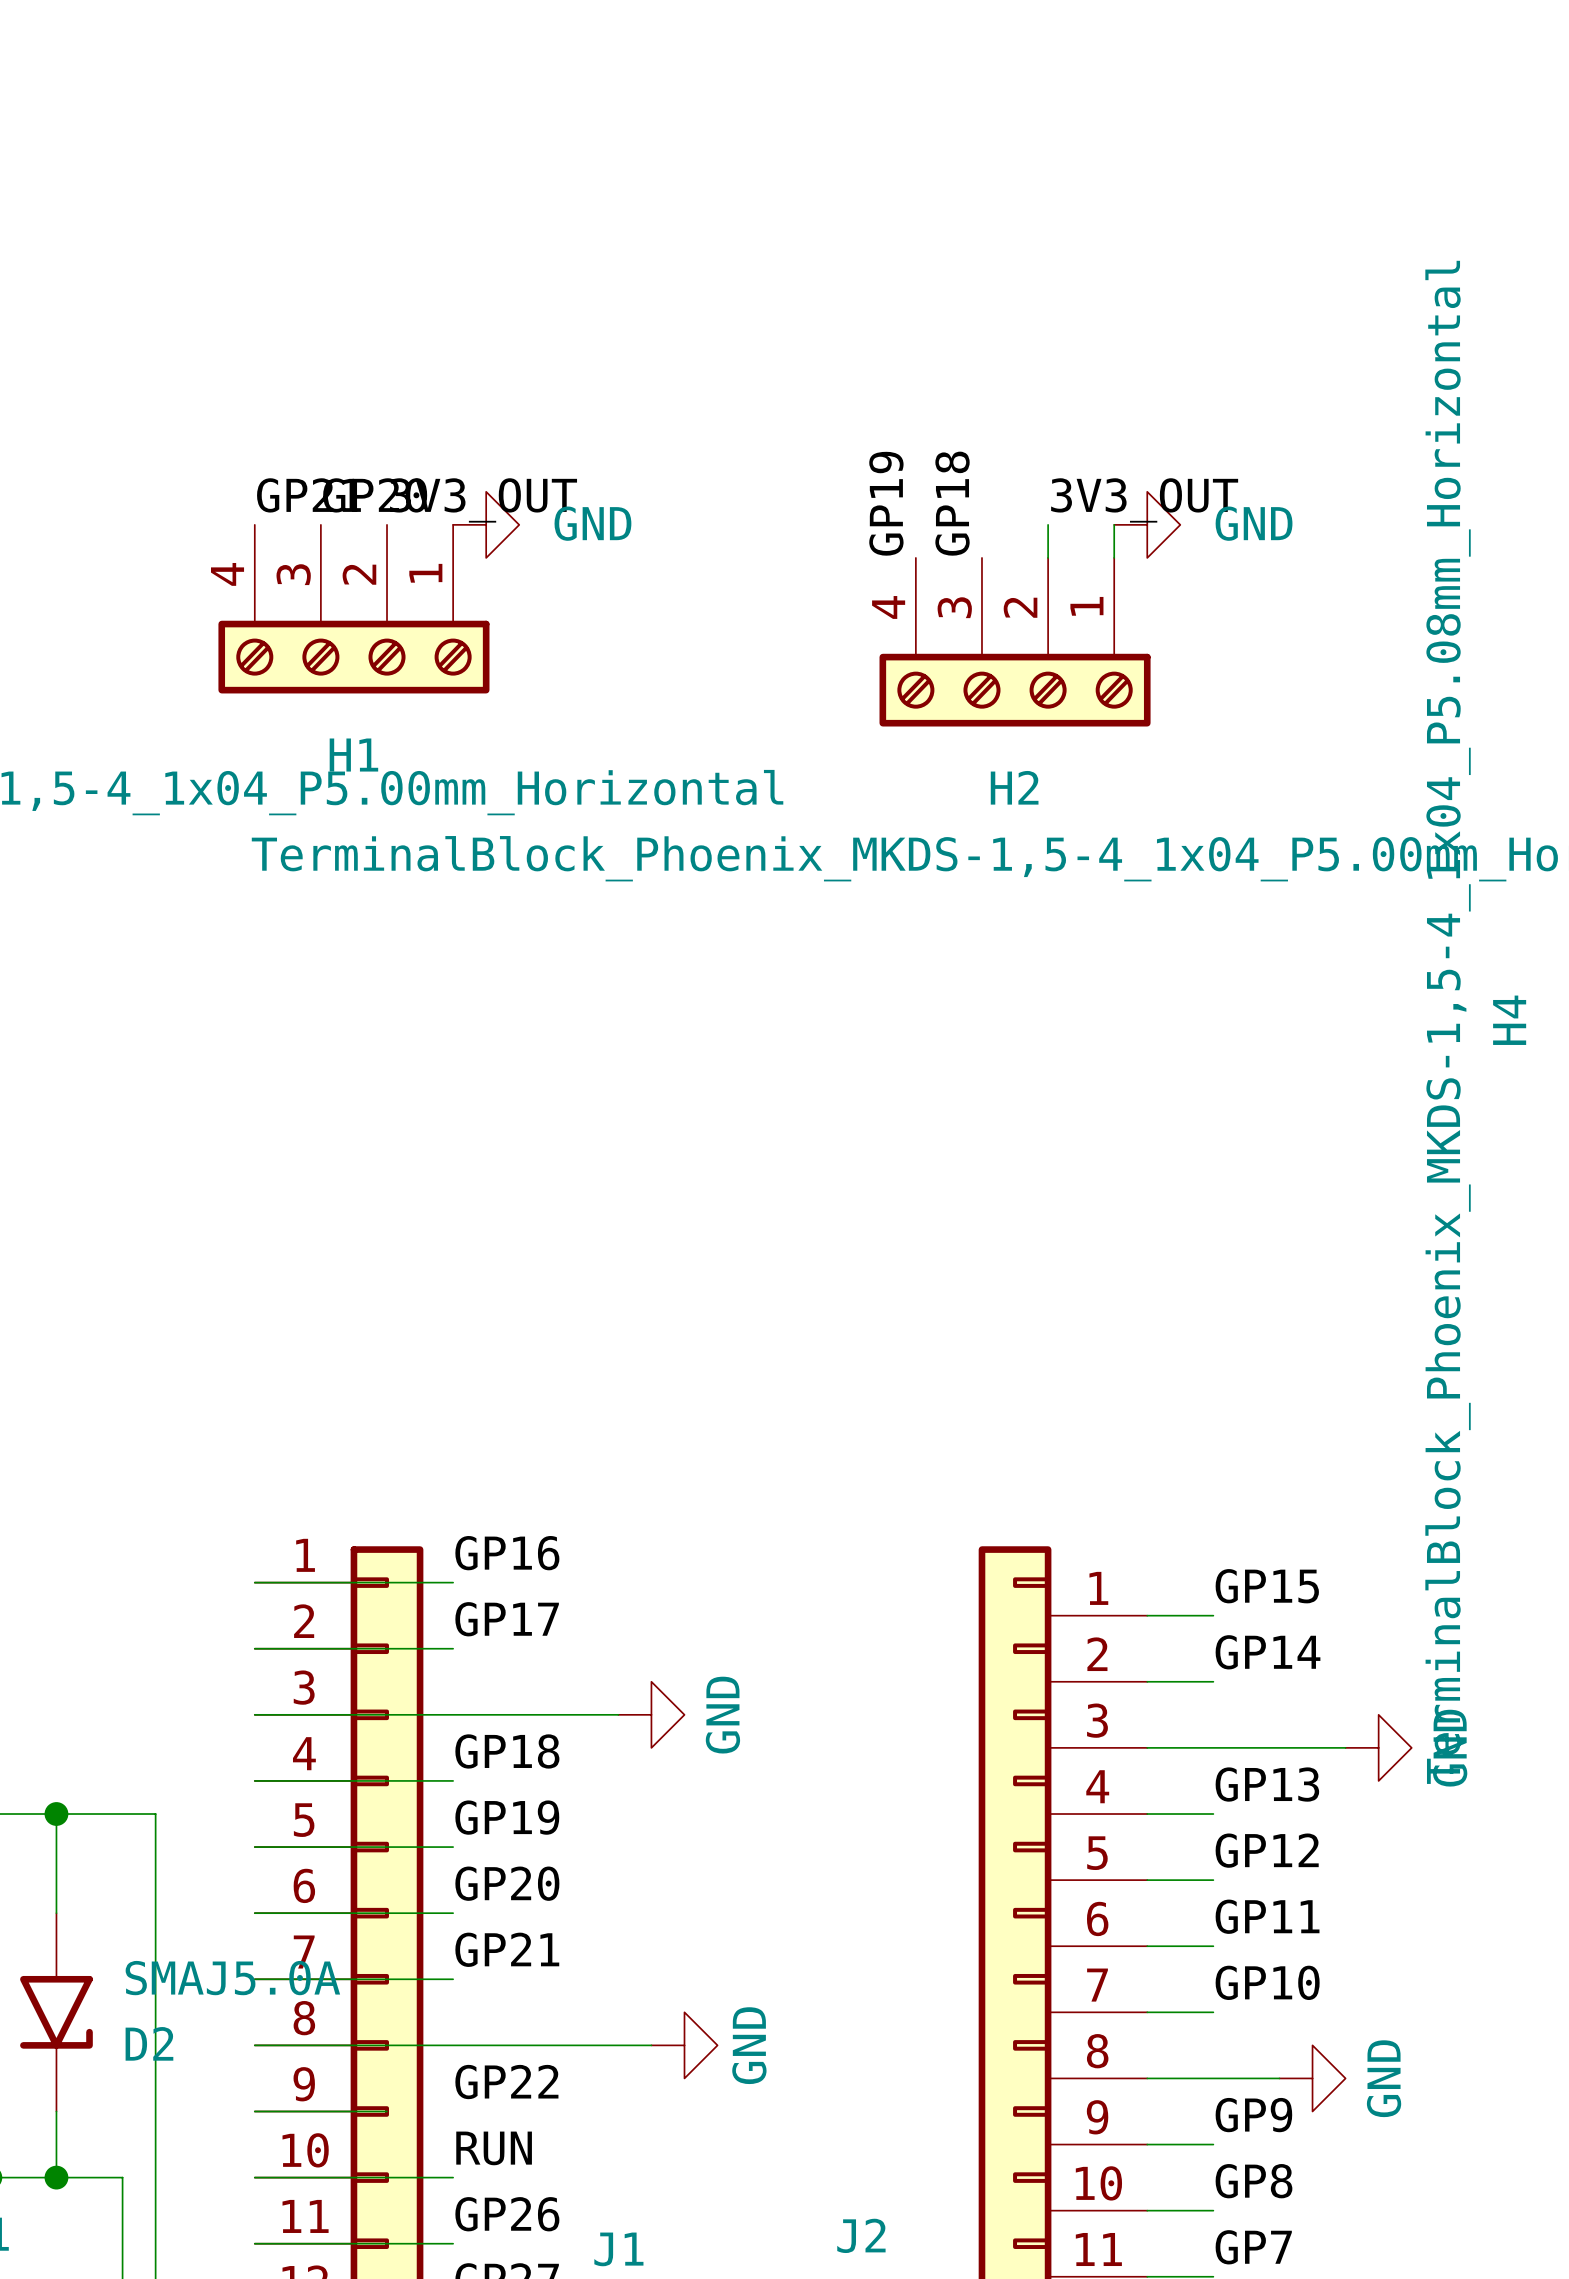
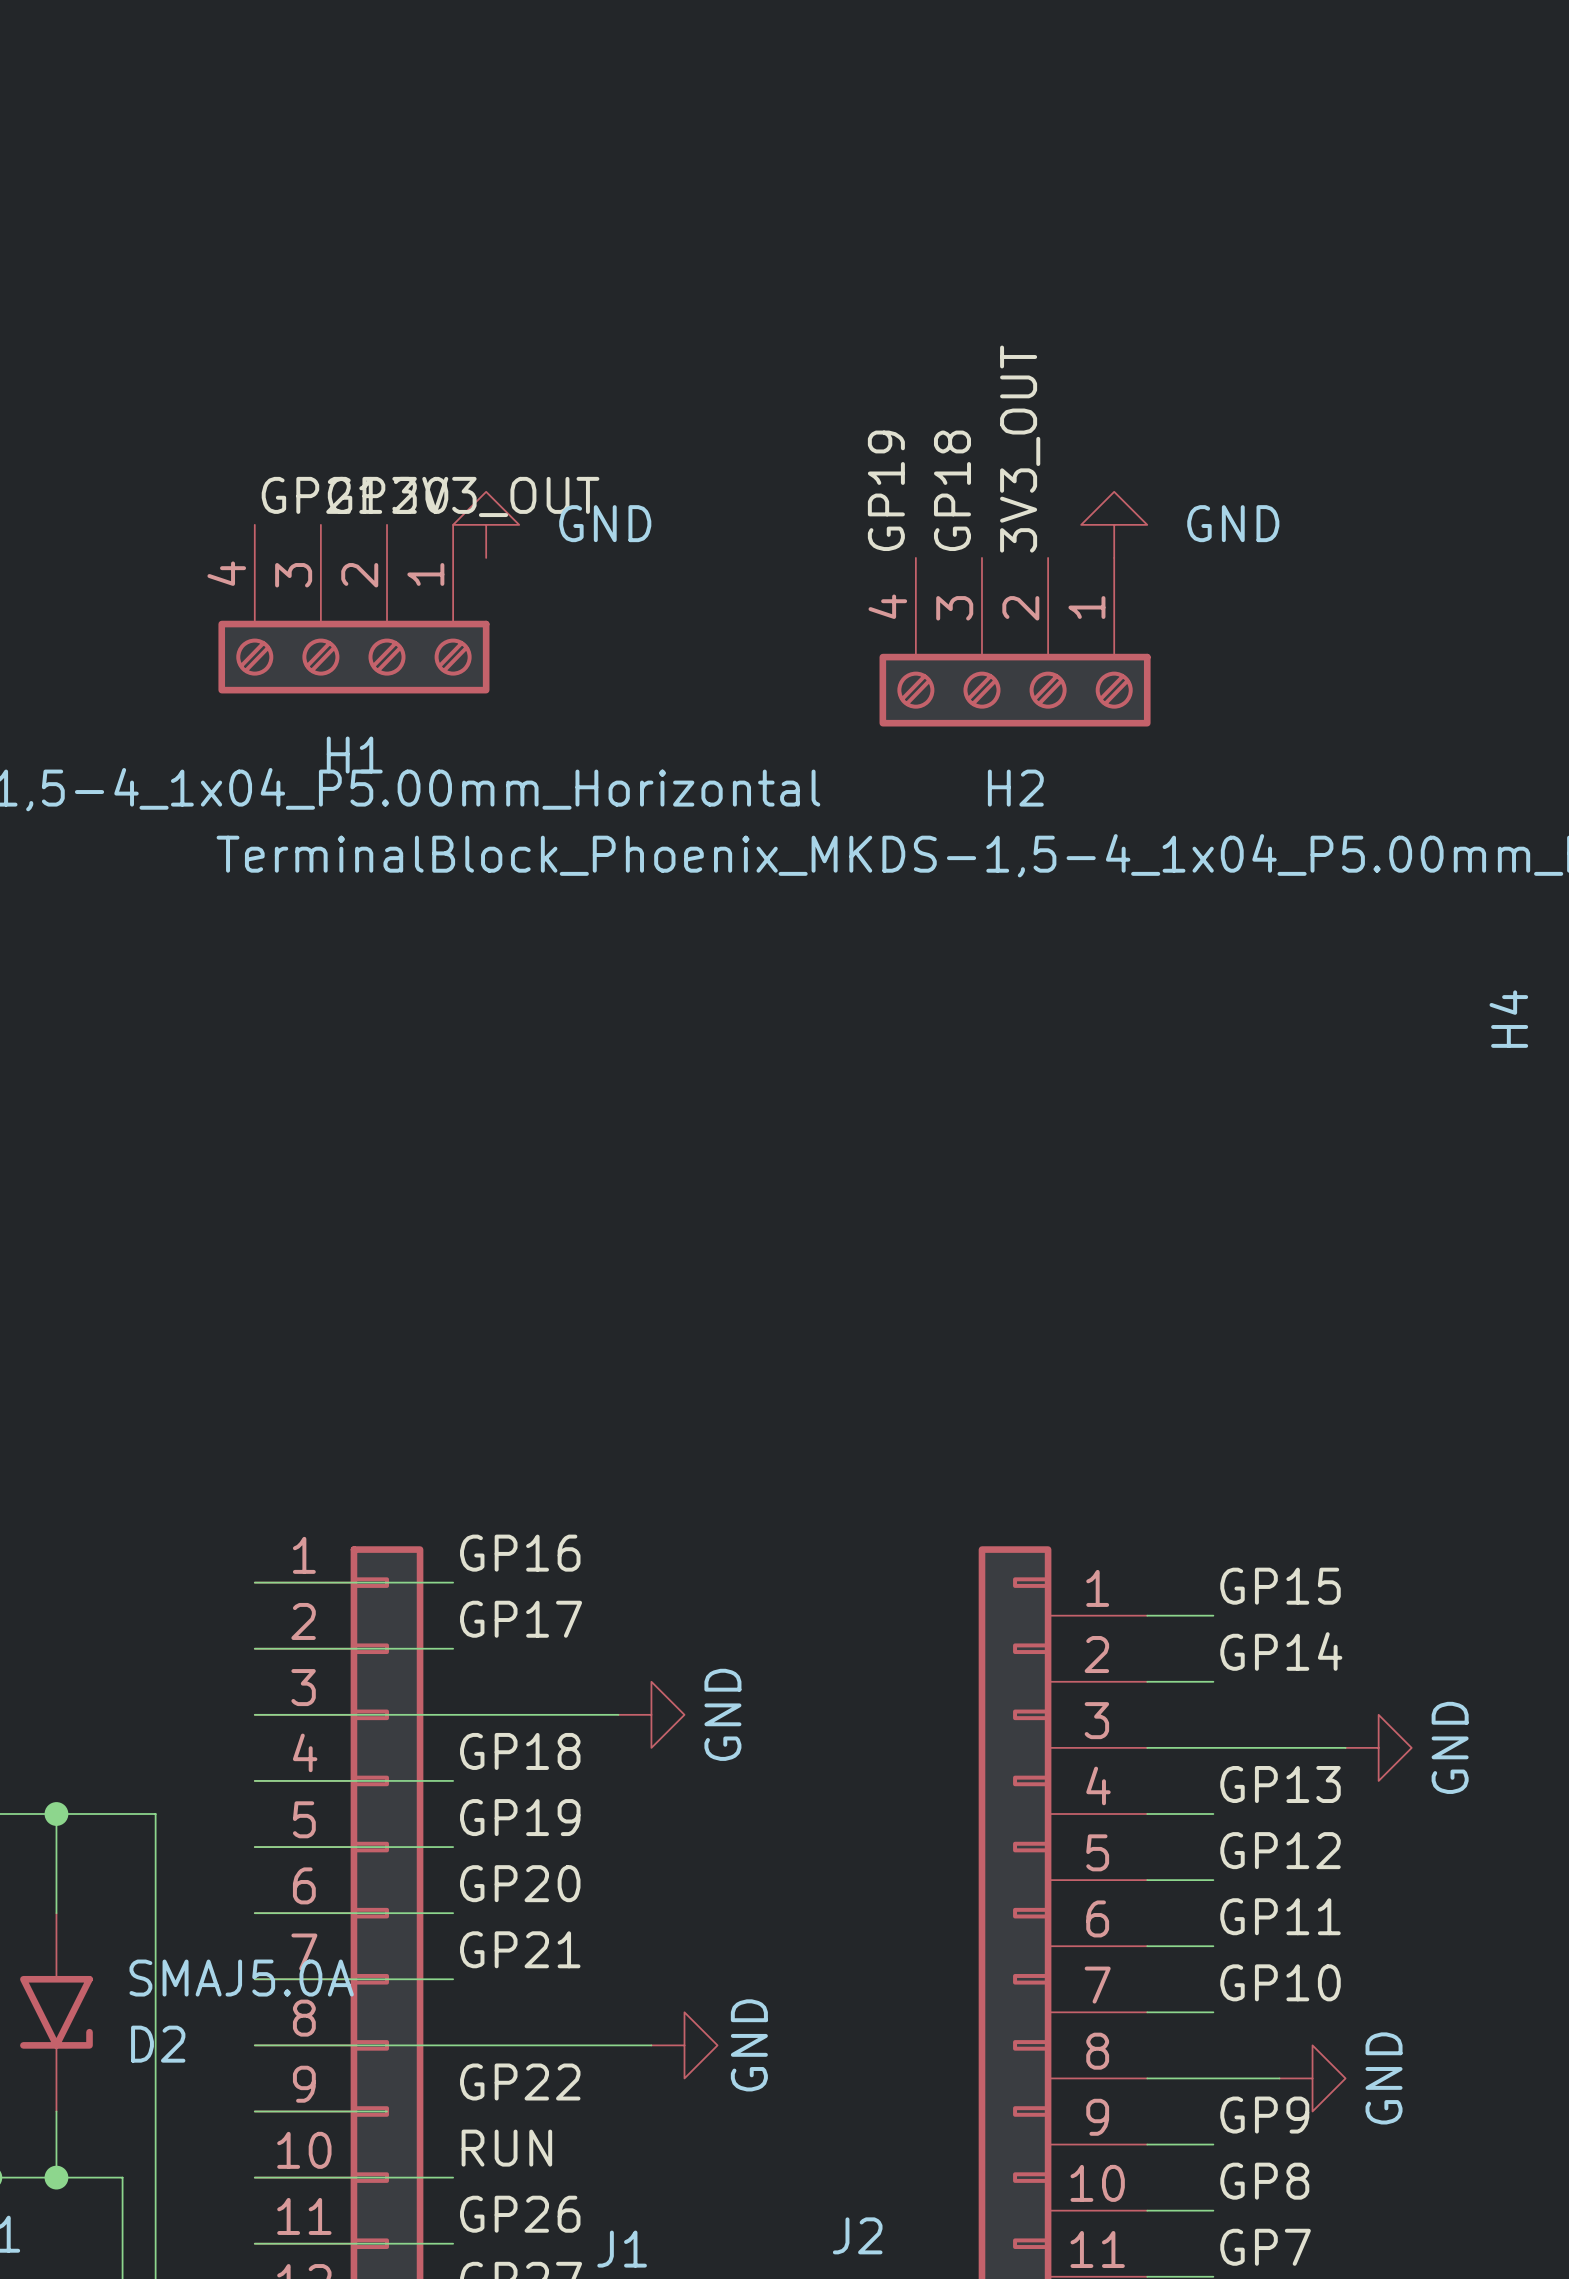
label rotation: 0° (1144, 500) -> 90° counterclockwise (1020, 449)
power symbol rotation: 0° (486, 524) -> 90° counterclockwise (486, 524)
wire: (1048, 524) (1048, 557) -> none
power symbol rotation: 0° (1147, 524) -> 90° counterclockwise (1114, 524)
H4 value: TerminalBlock_Phoenix_MKDS-1,5-4_1x04_P5.08mm_Horizontal (1448, 1022) -> none

